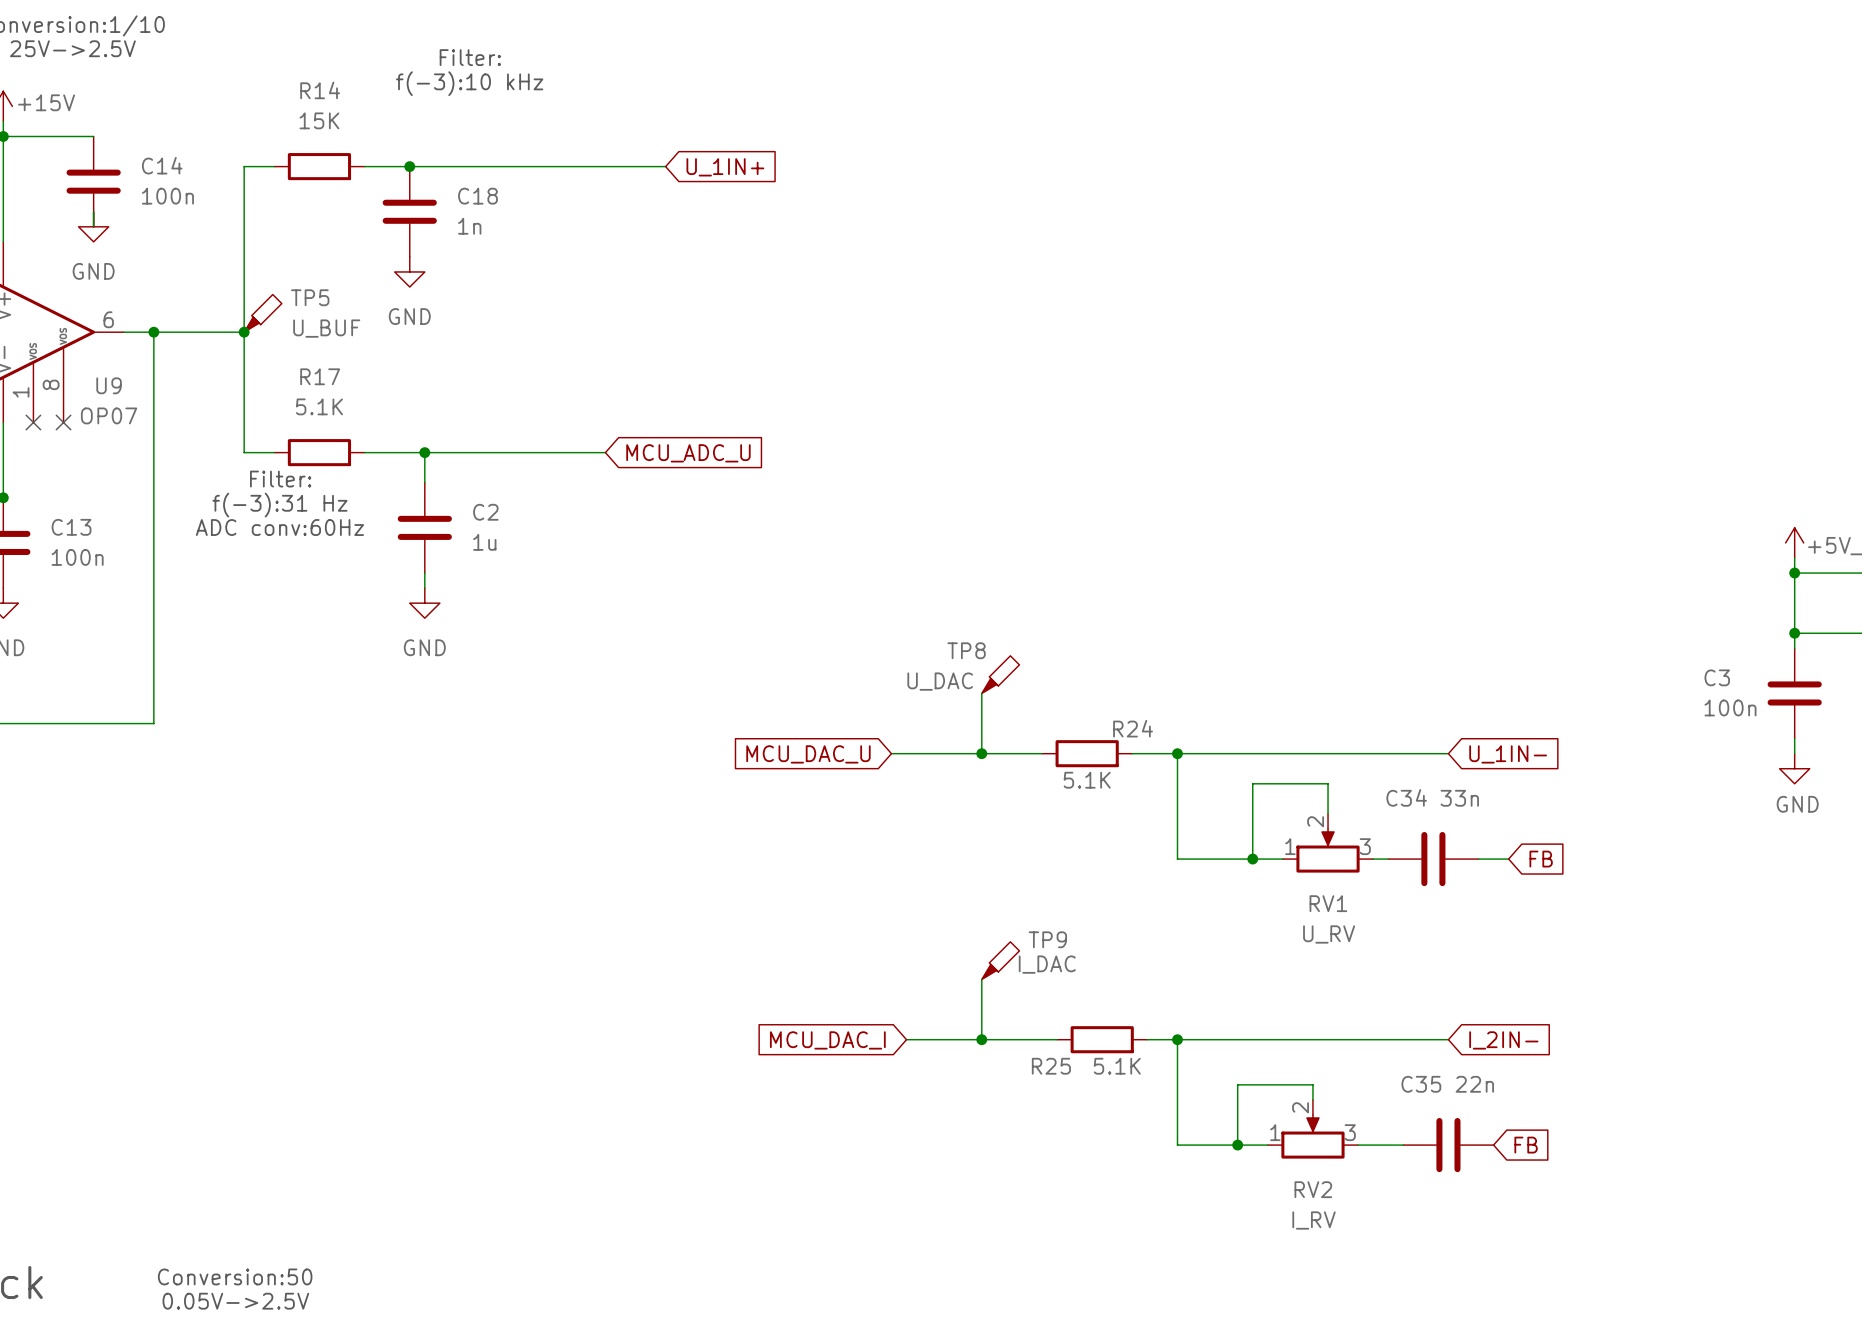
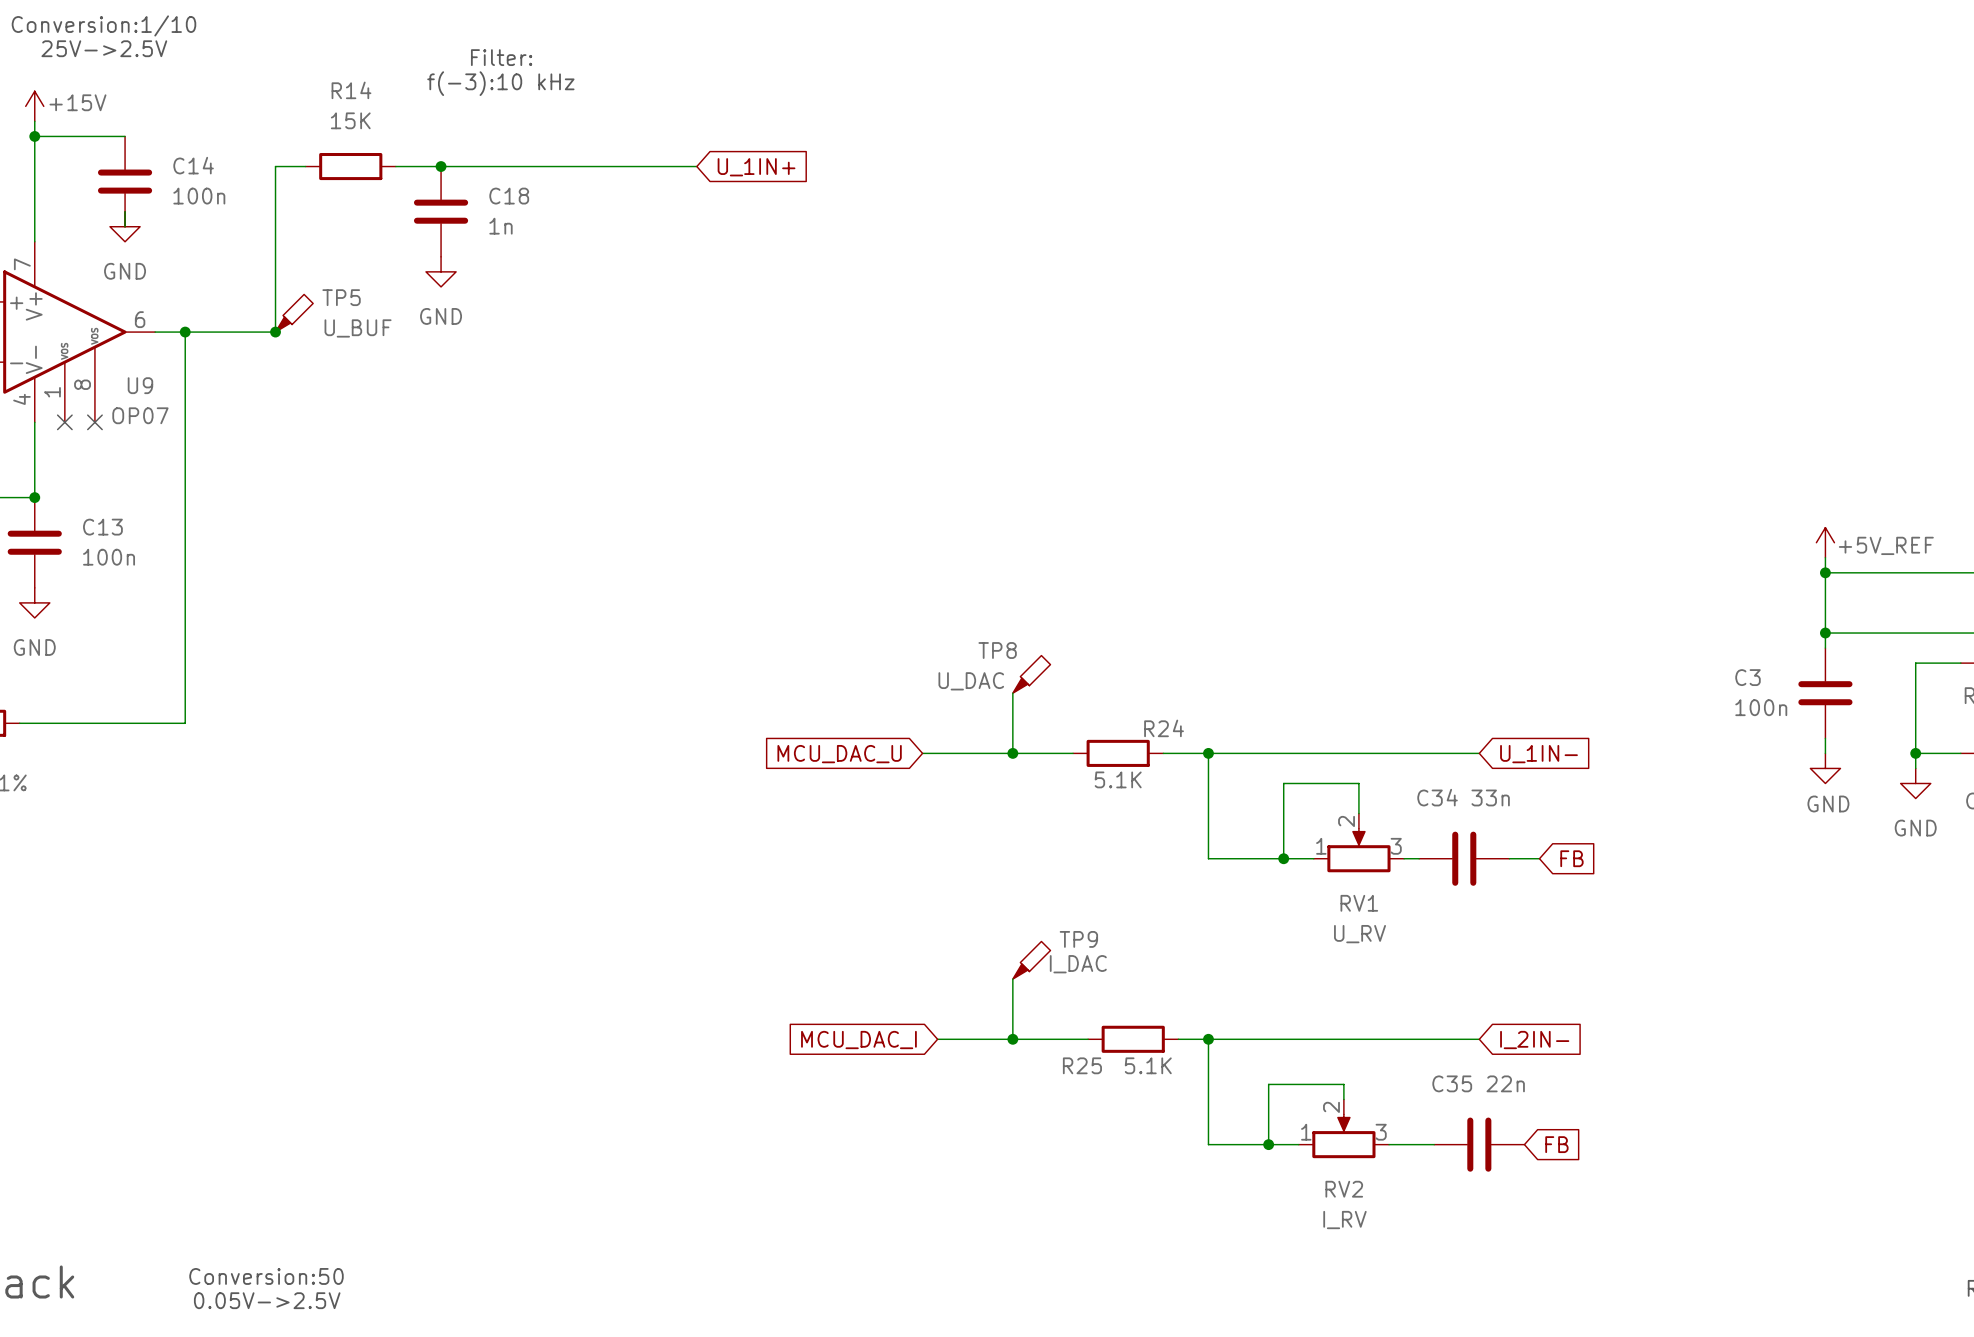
wire: (244, 332) (244, 452) (274, 452) -> none
R17: 5.1K (319, 452) -> none
wire: (364, 452) (605, 452) -> none
wire: (424, 452) (424, 482) -> none
junction: (424, 452) -> none
global label: MCU_ADC_U (688, 453) -> none
text: Filter: (280, 479) -> none
text: f(-3):31 Hz (279, 505) -> none
text: ADC conv:60Hz (279, 527) -> none
C2: 1u (424, 527) -> none
wire: (424, 573) (424, 588) -> none
power symbol: GND (424, 603) -> none

